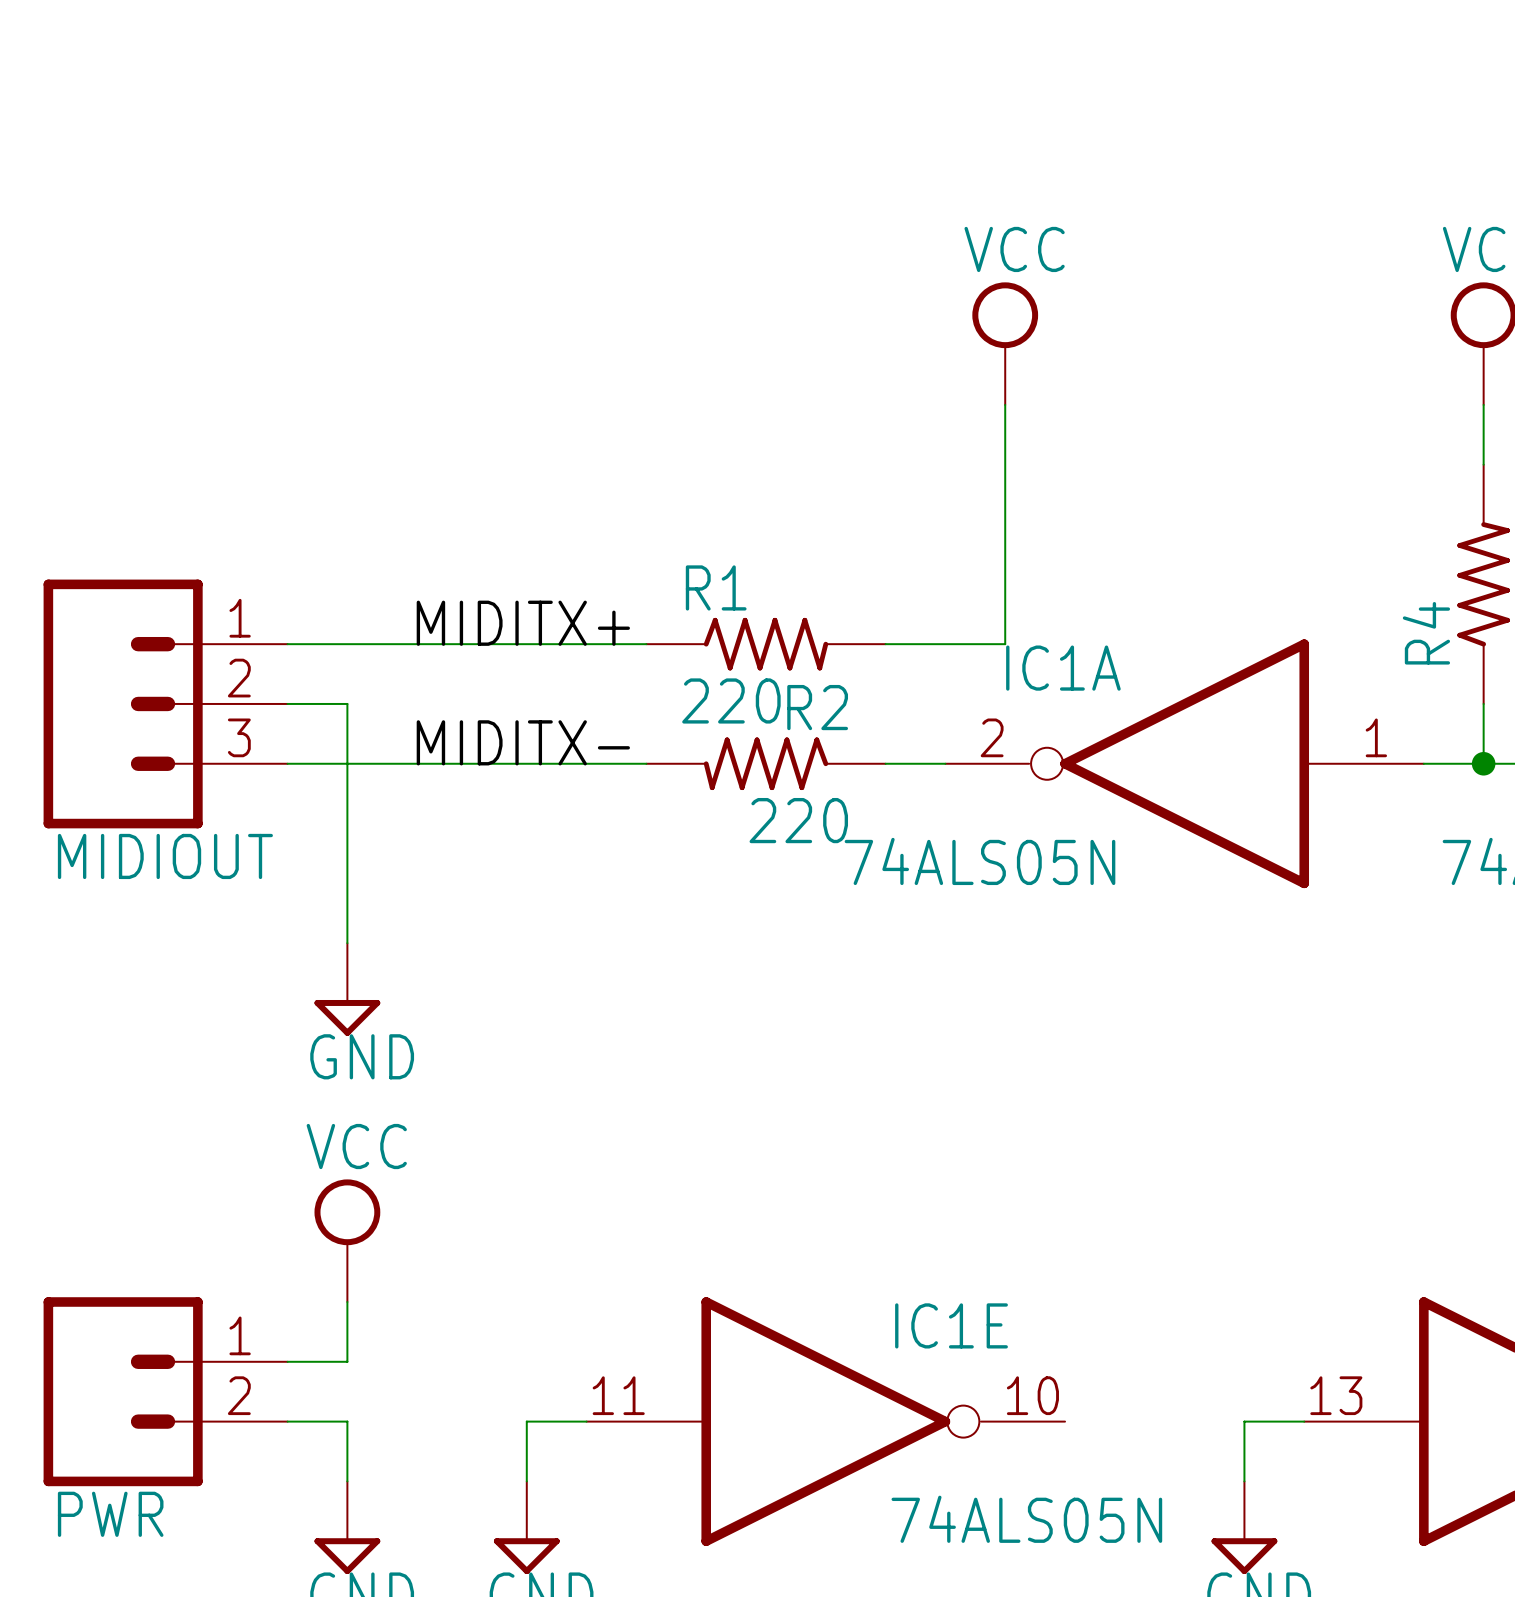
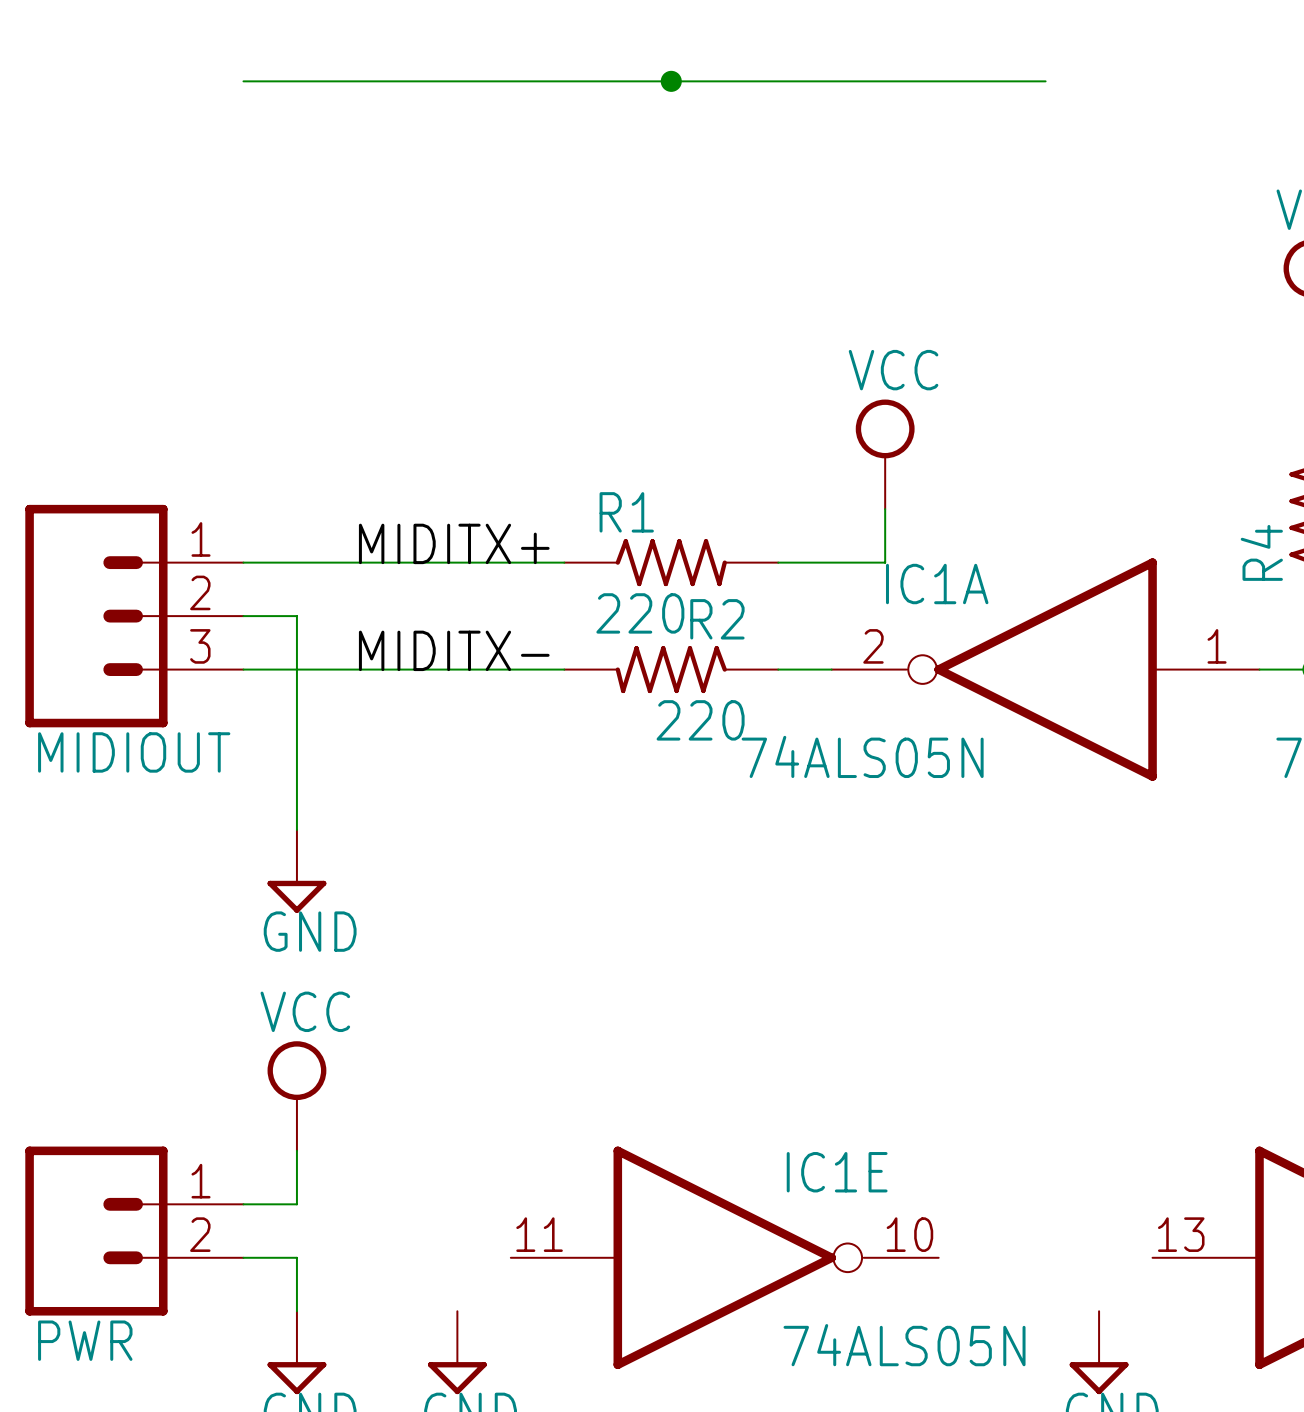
wire: none -> (243, 81) (1045, 81)
junction: none -> (671, 81)
power symbol position: VCC (1005, 343) -> VCC (885, 454)
wire: (1005, 404) (1005, 584) -> none
wire: (586, 1421) (526, 1421) (526, 1481) -> none
wire: (1304, 1421) (1244, 1421) (1244, 1481) -> none

